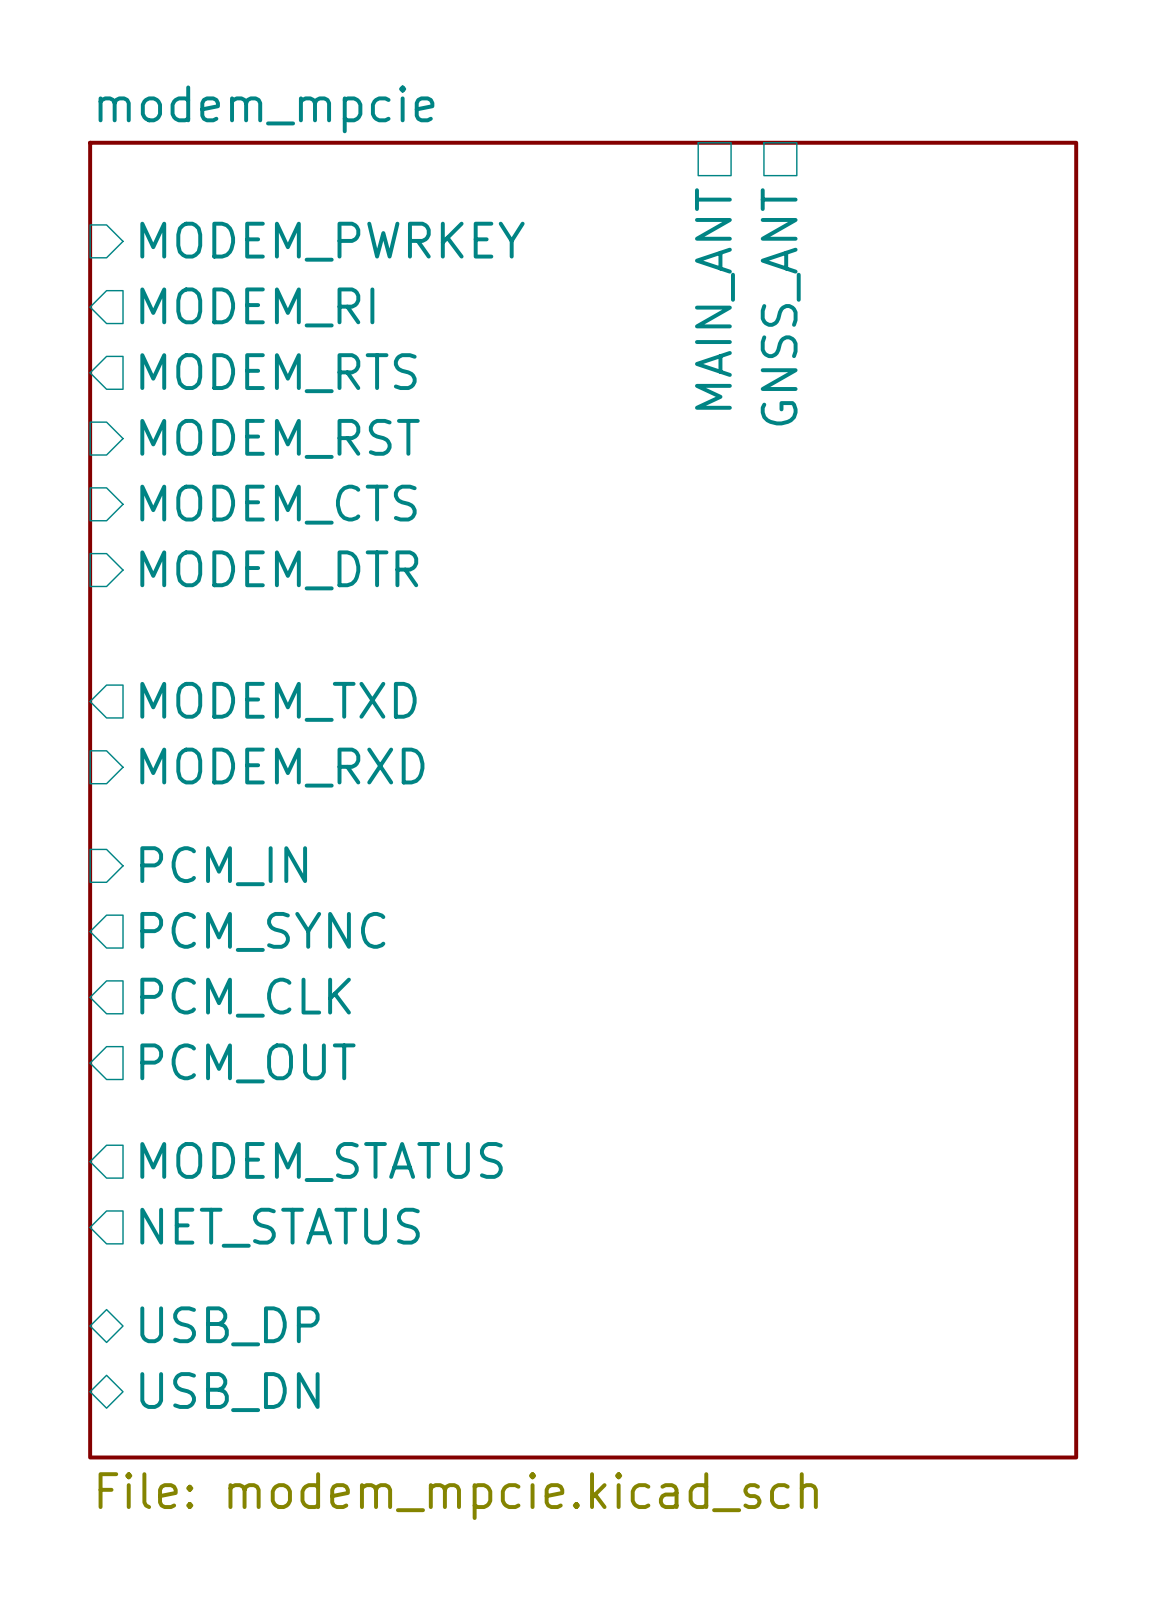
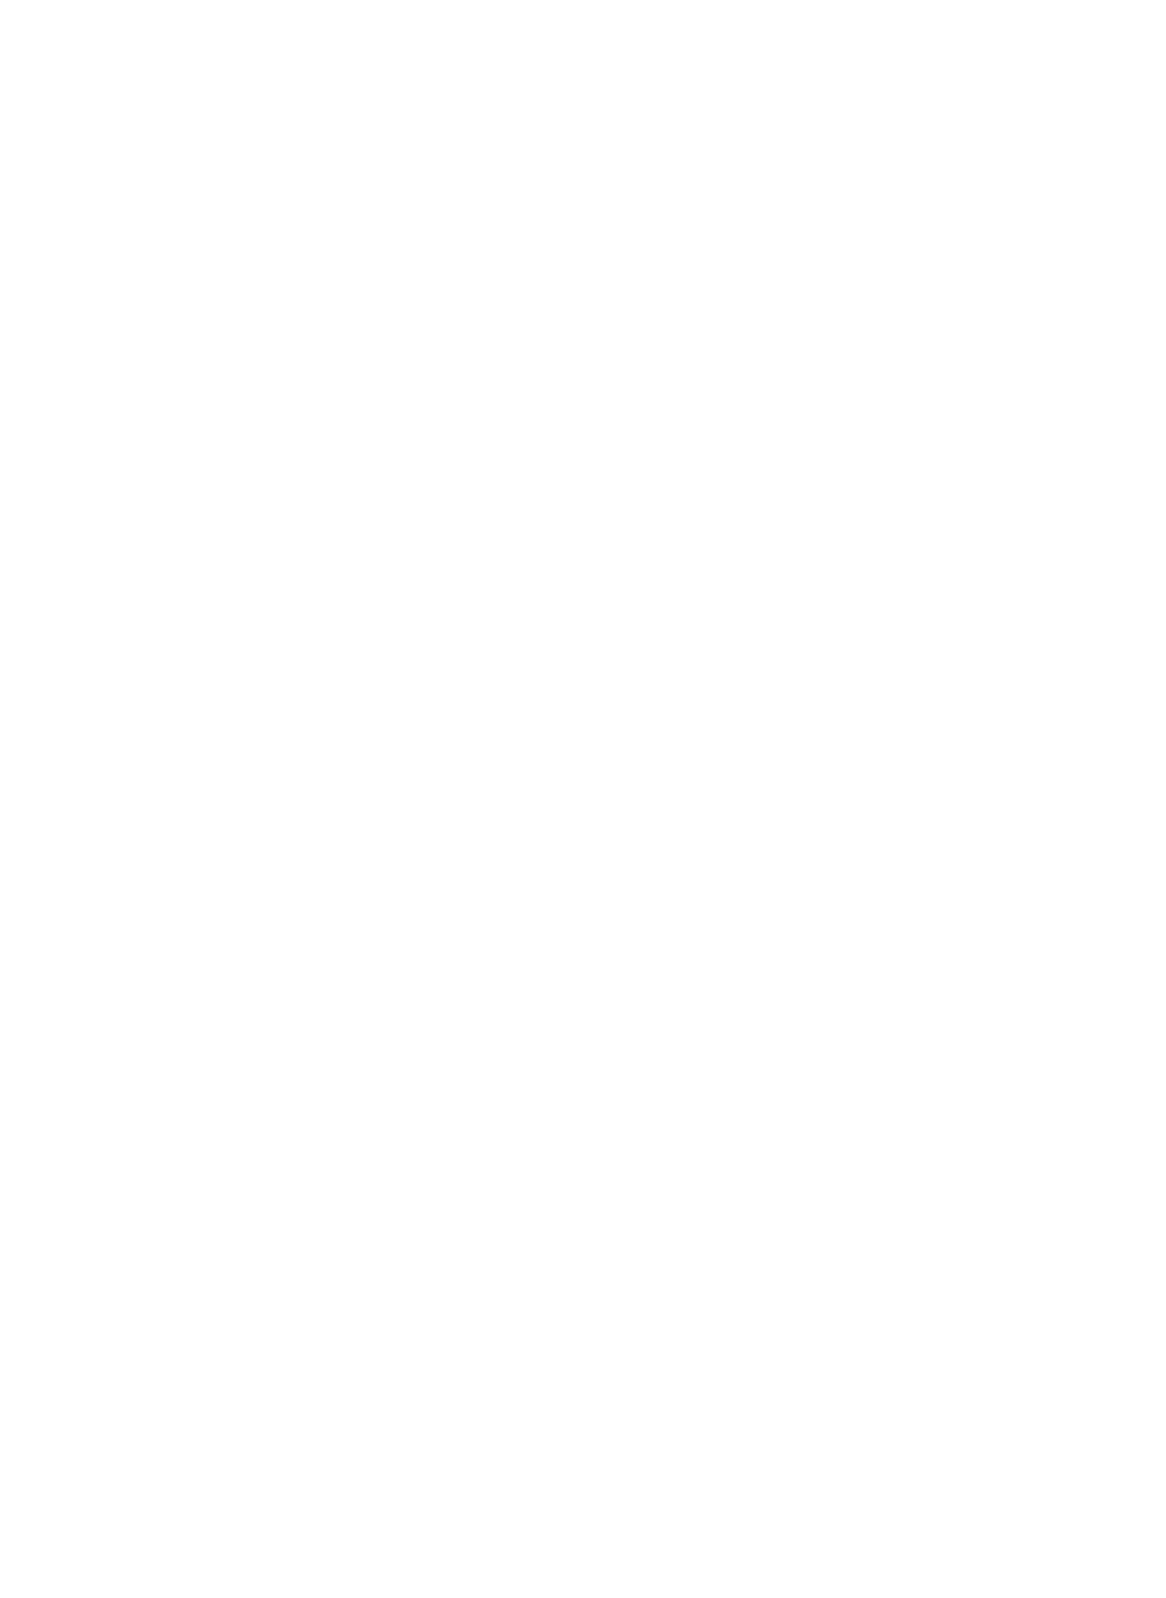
sheet pin: MODEM_PWRKEY (332, 241) -> none
sheet pin: MAIN_ANT (714, 299) -> none
sheet pin: GNSS_ANT (780, 306) -> none
sheet pin: MODEM_RI (257, 307) -> none
sheet pin: MODEM_RTS (278, 373) -> none
sheet pin: MODEM_RST (280, 438) -> none
sheet pin: MODEM_CTS (278, 504) -> none
sheet pin: MODEM_DTR (279, 570) -> none
sheet pin: MODEM_TXD (278, 701) -> none
sheet pin: MODEM_RXD (282, 767) -> none
sheet modem_mpcie: File: modem_mpcie.kicad_sch (583, 800) -> none
sheet pin: PCM_IN (223, 866) -> none
sheet pin: PCM_SYNC (262, 931) -> none
sheet pin: PCM_CLK (245, 997) -> none
sheet pin: PCM_OUT (247, 1063) -> none
sheet pin: MODEM_STATUS (321, 1162) -> none
sheet pin: NET_STATUS (280, 1227) -> none
sheet pin: USB_DP (229, 1326) -> none
sheet pin: USB_DN (229, 1392) -> none

